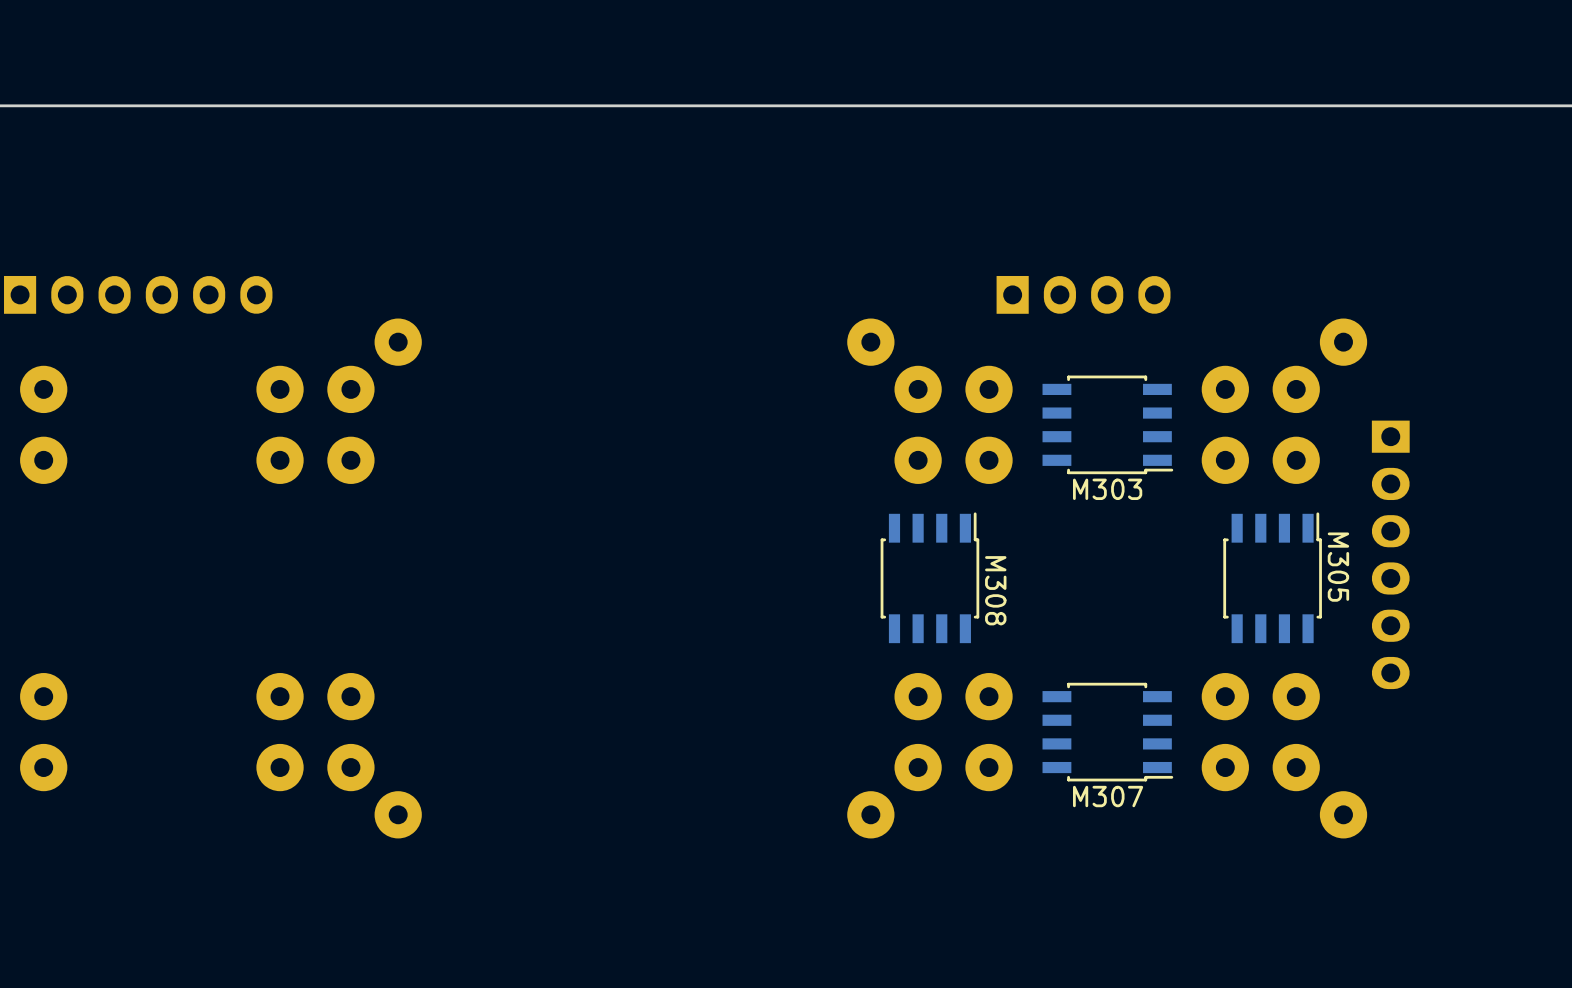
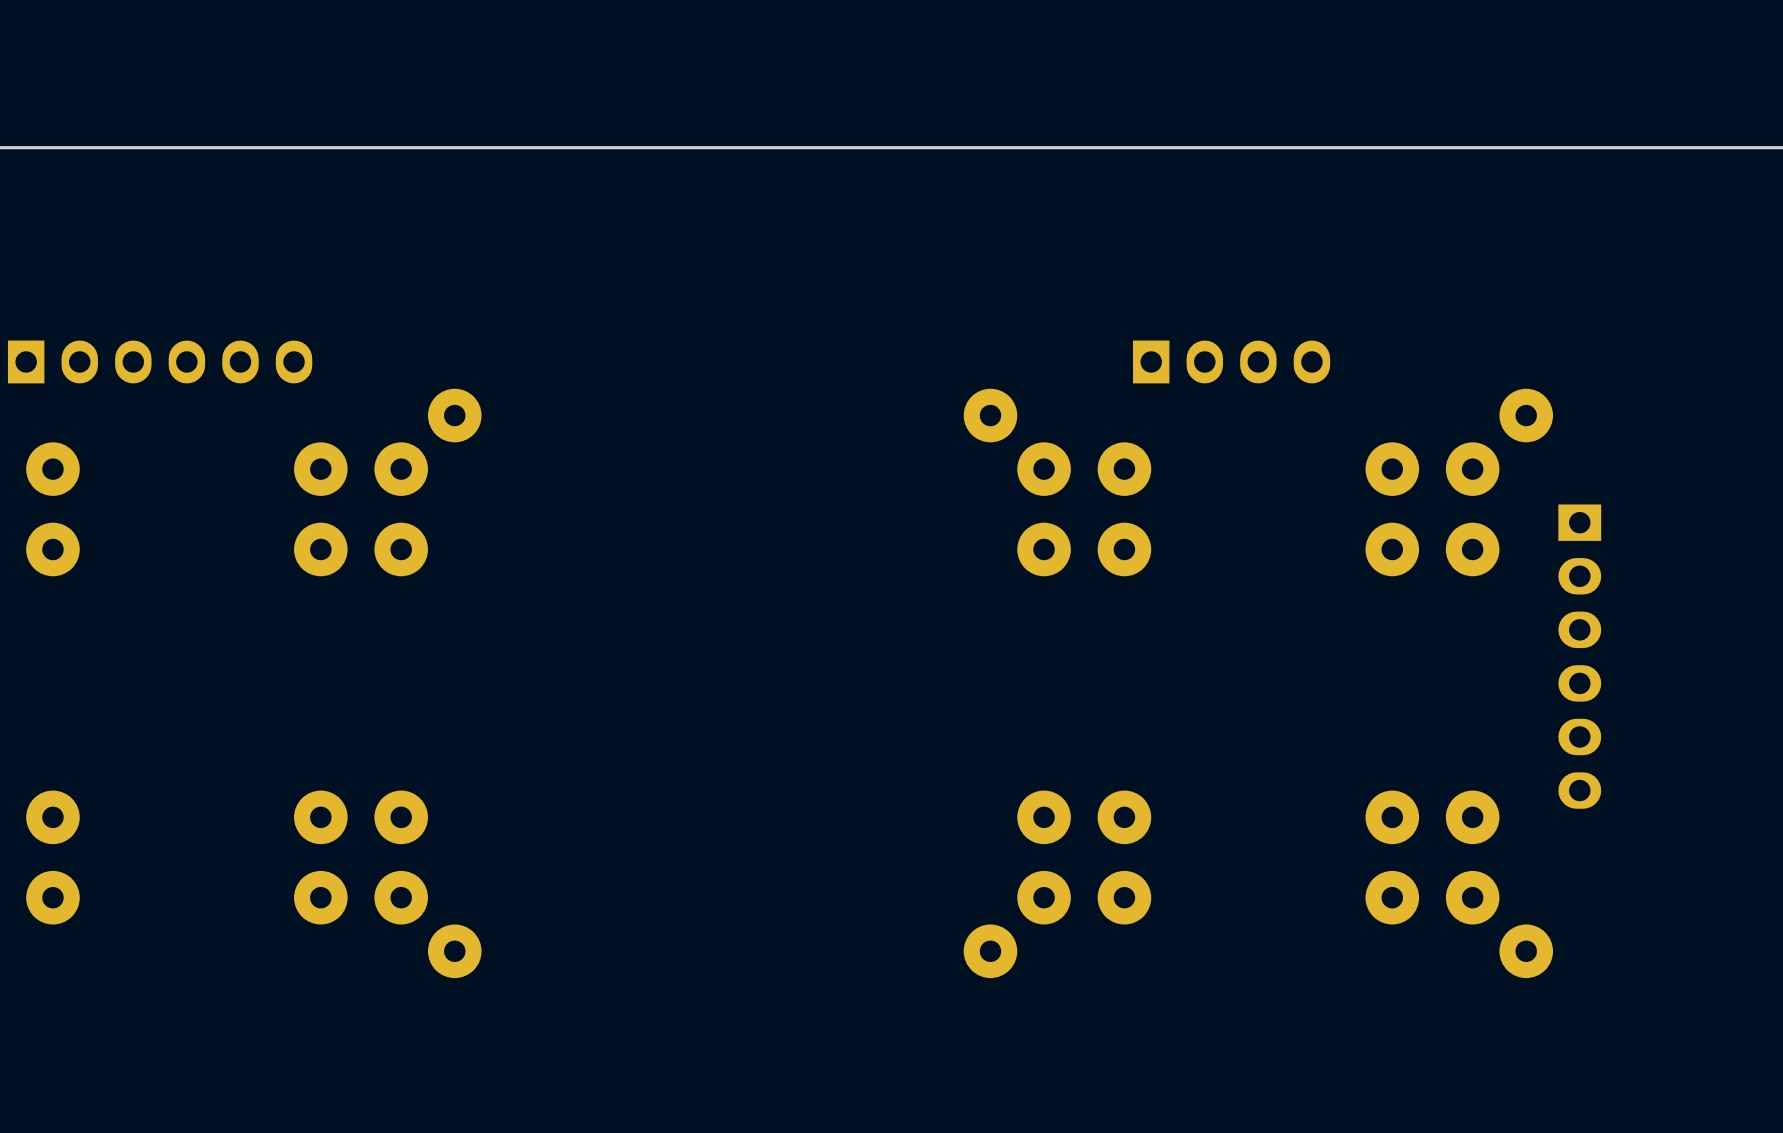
M303: (1107, 424) -> none
M308: (929, 577) -> none
M305: (1272, 577) -> none
M307: (1107, 732) -> none

